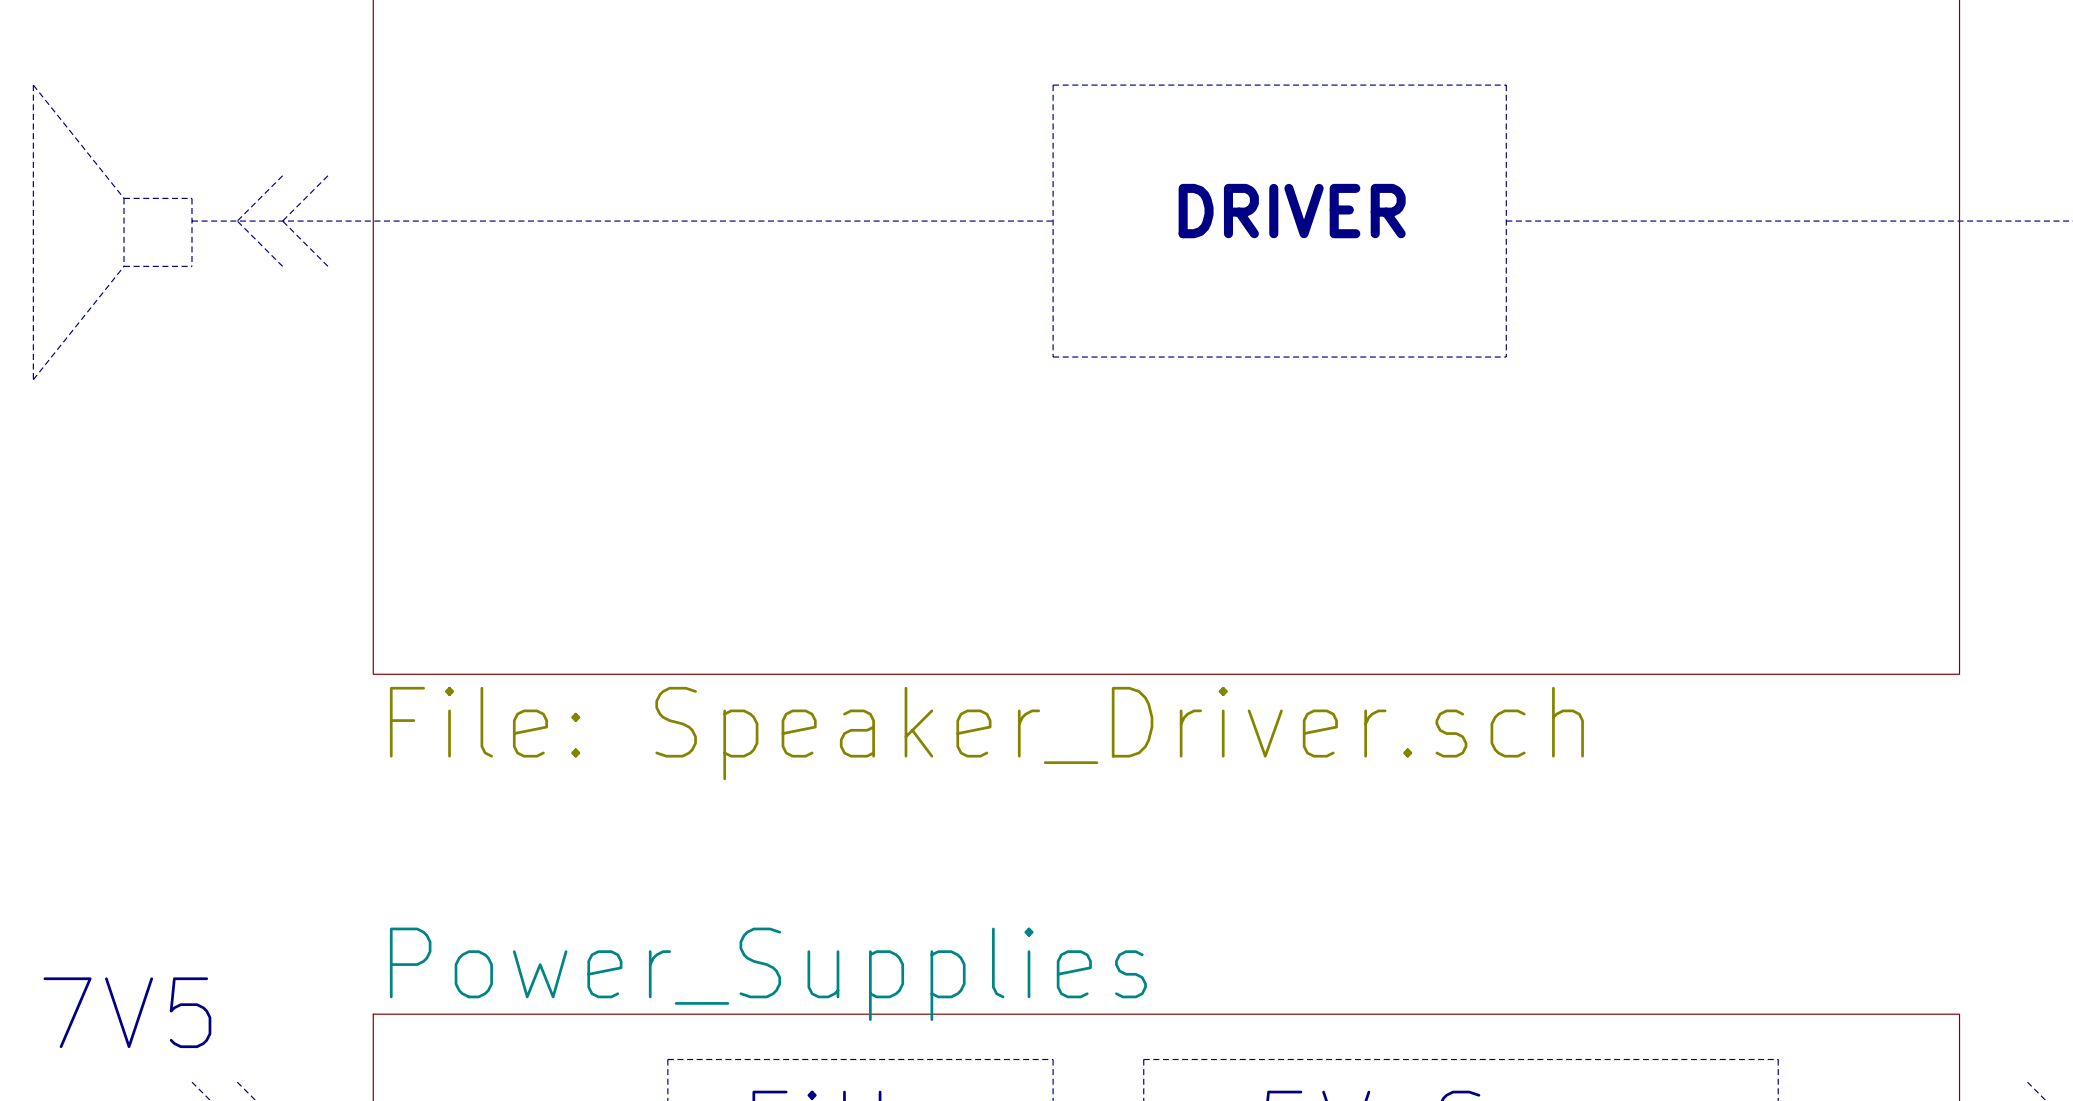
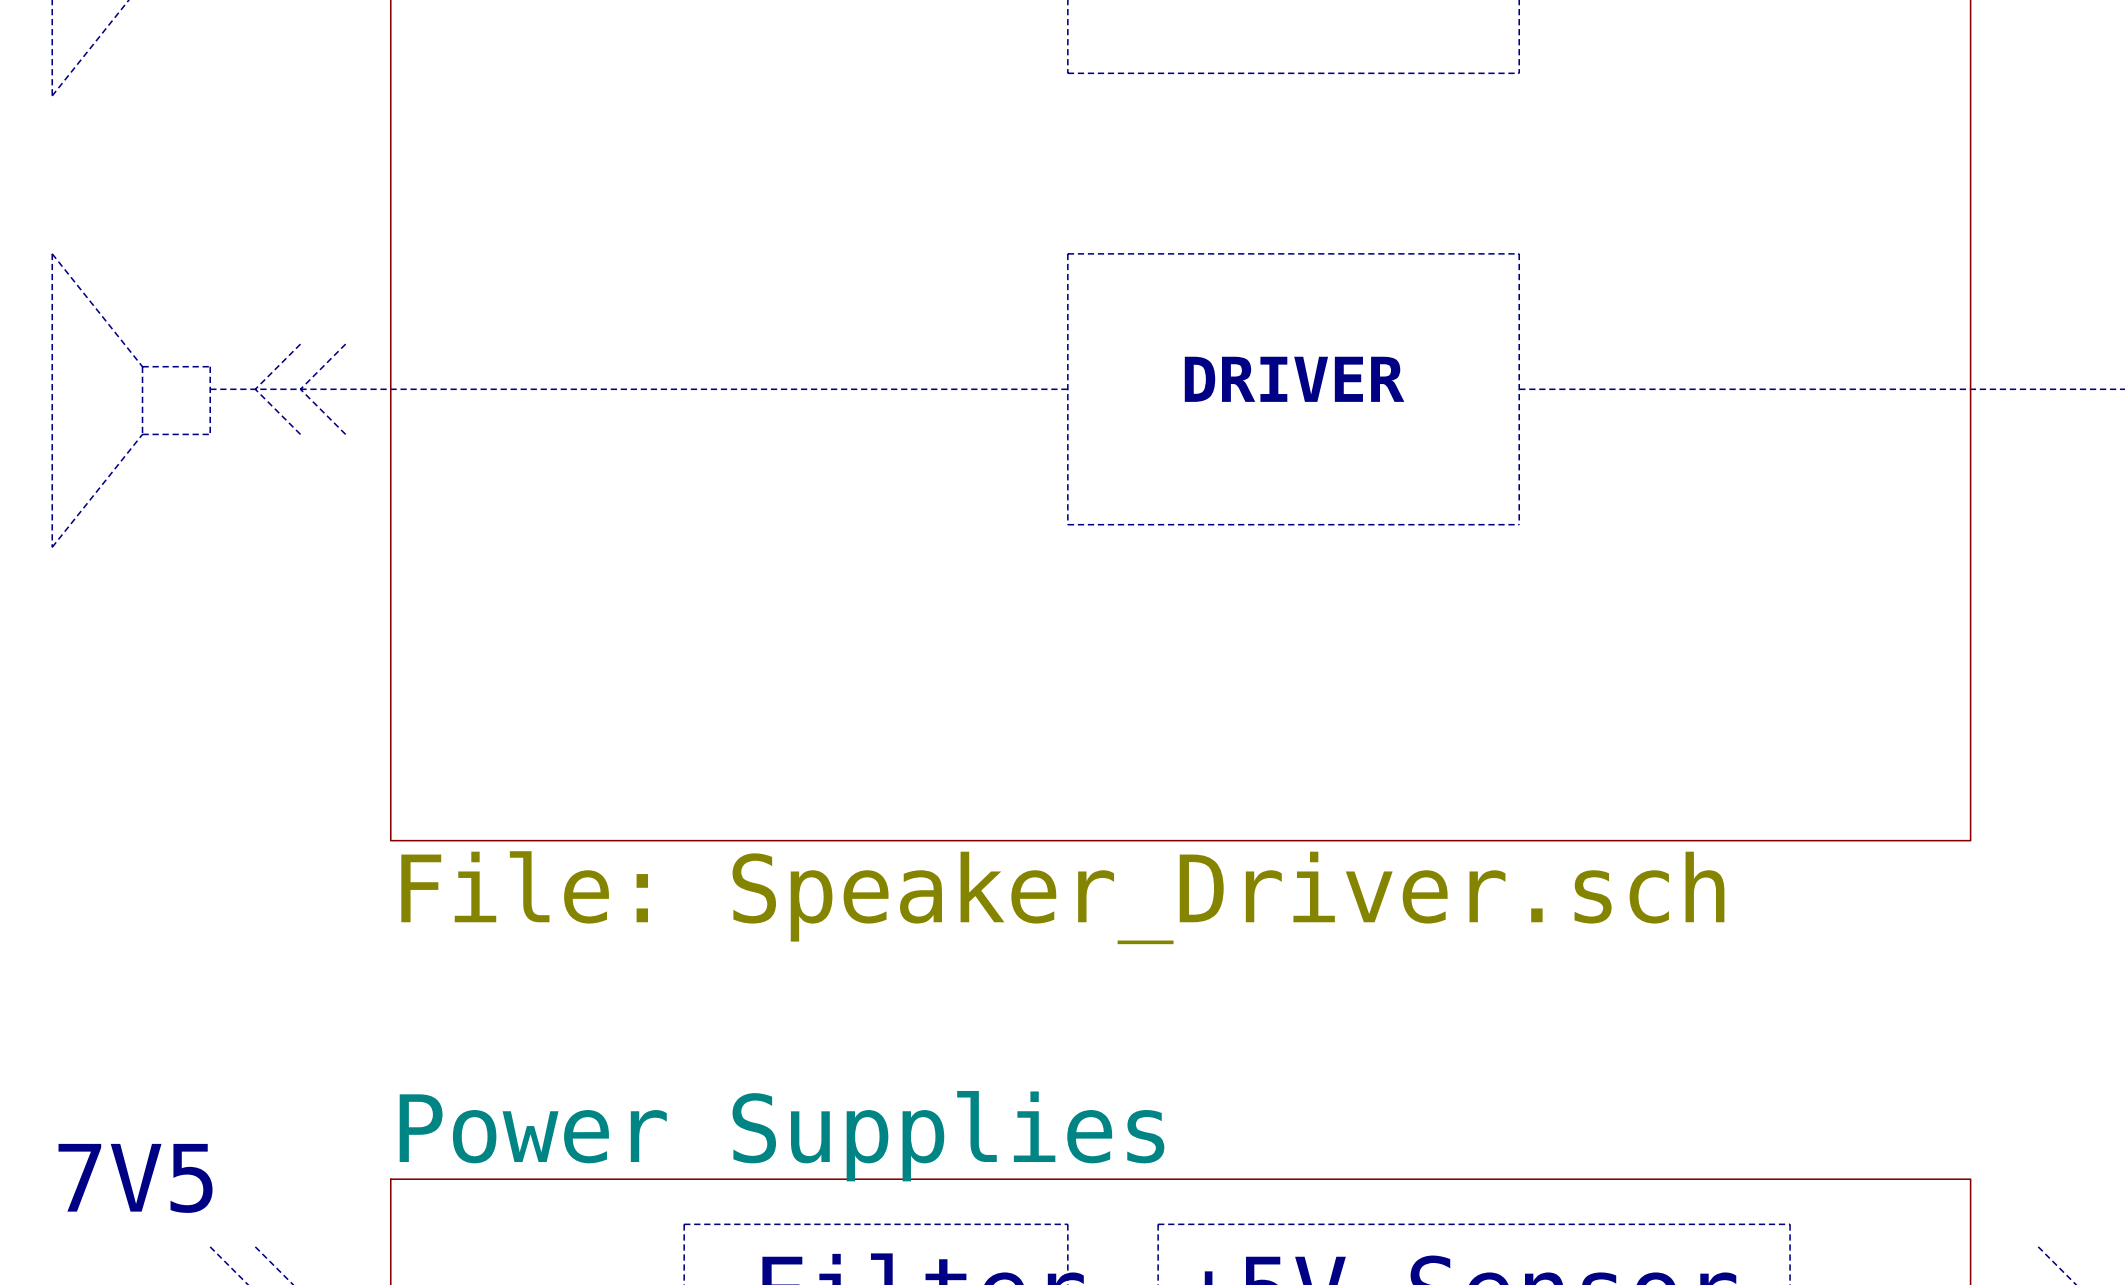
sheet Power_Supplies name: Power_Supplies (768, 974) -> Power Supplies (782, 1136)

